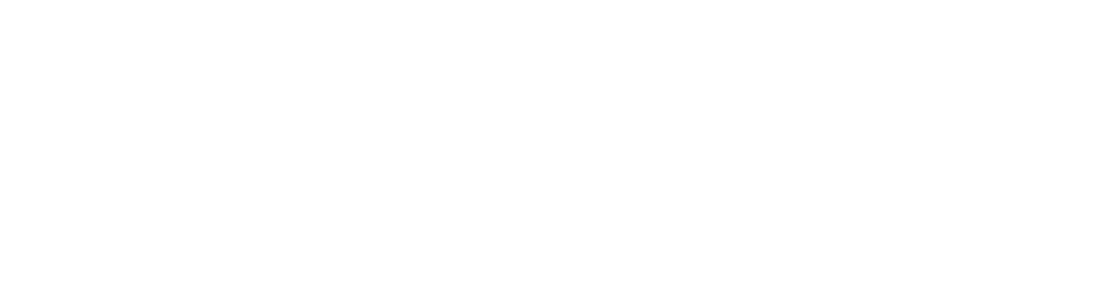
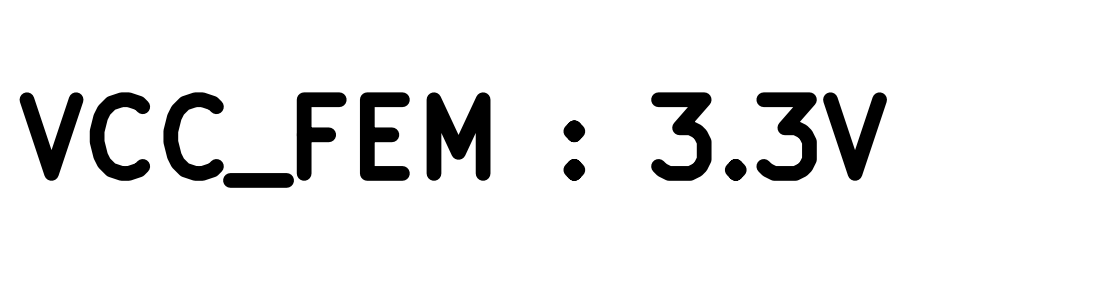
text: none -> VCC_FEM : 3.3V (453, 140)

